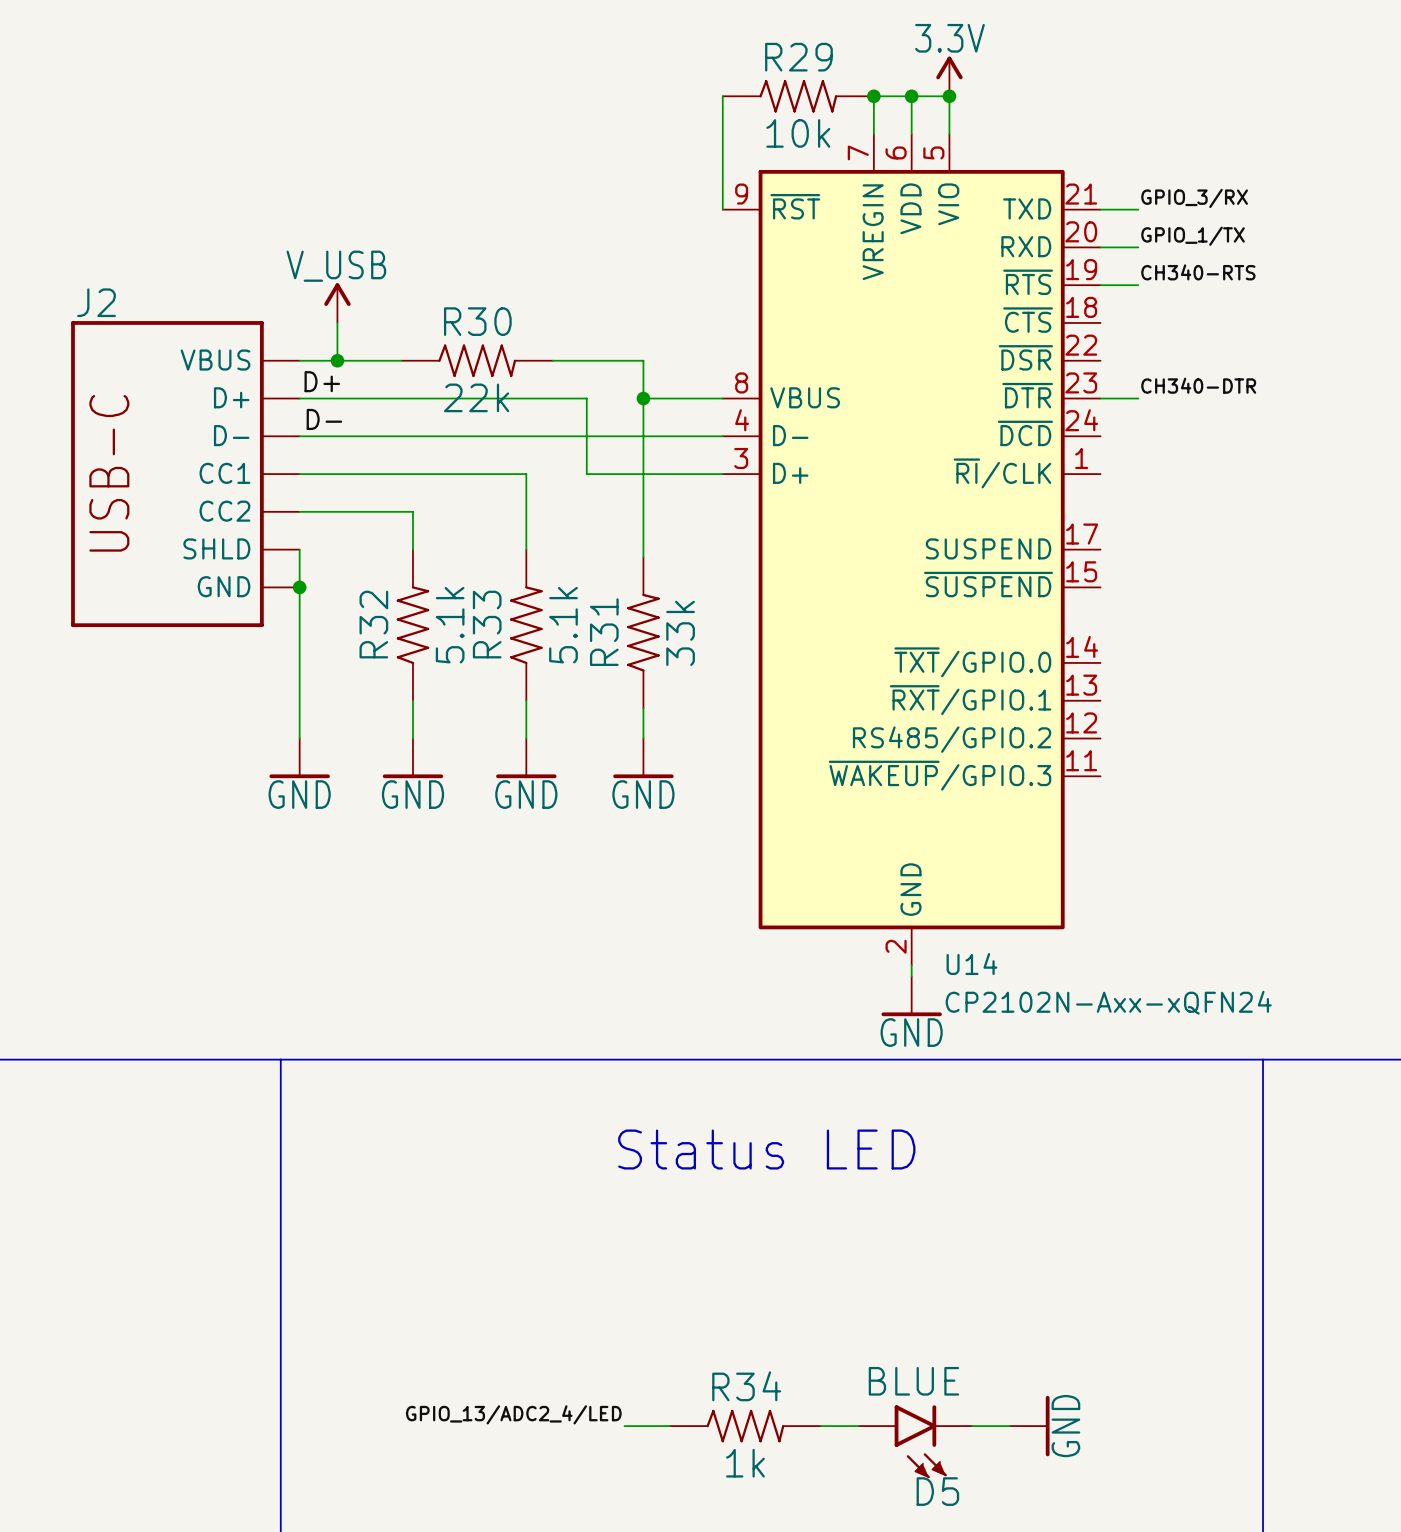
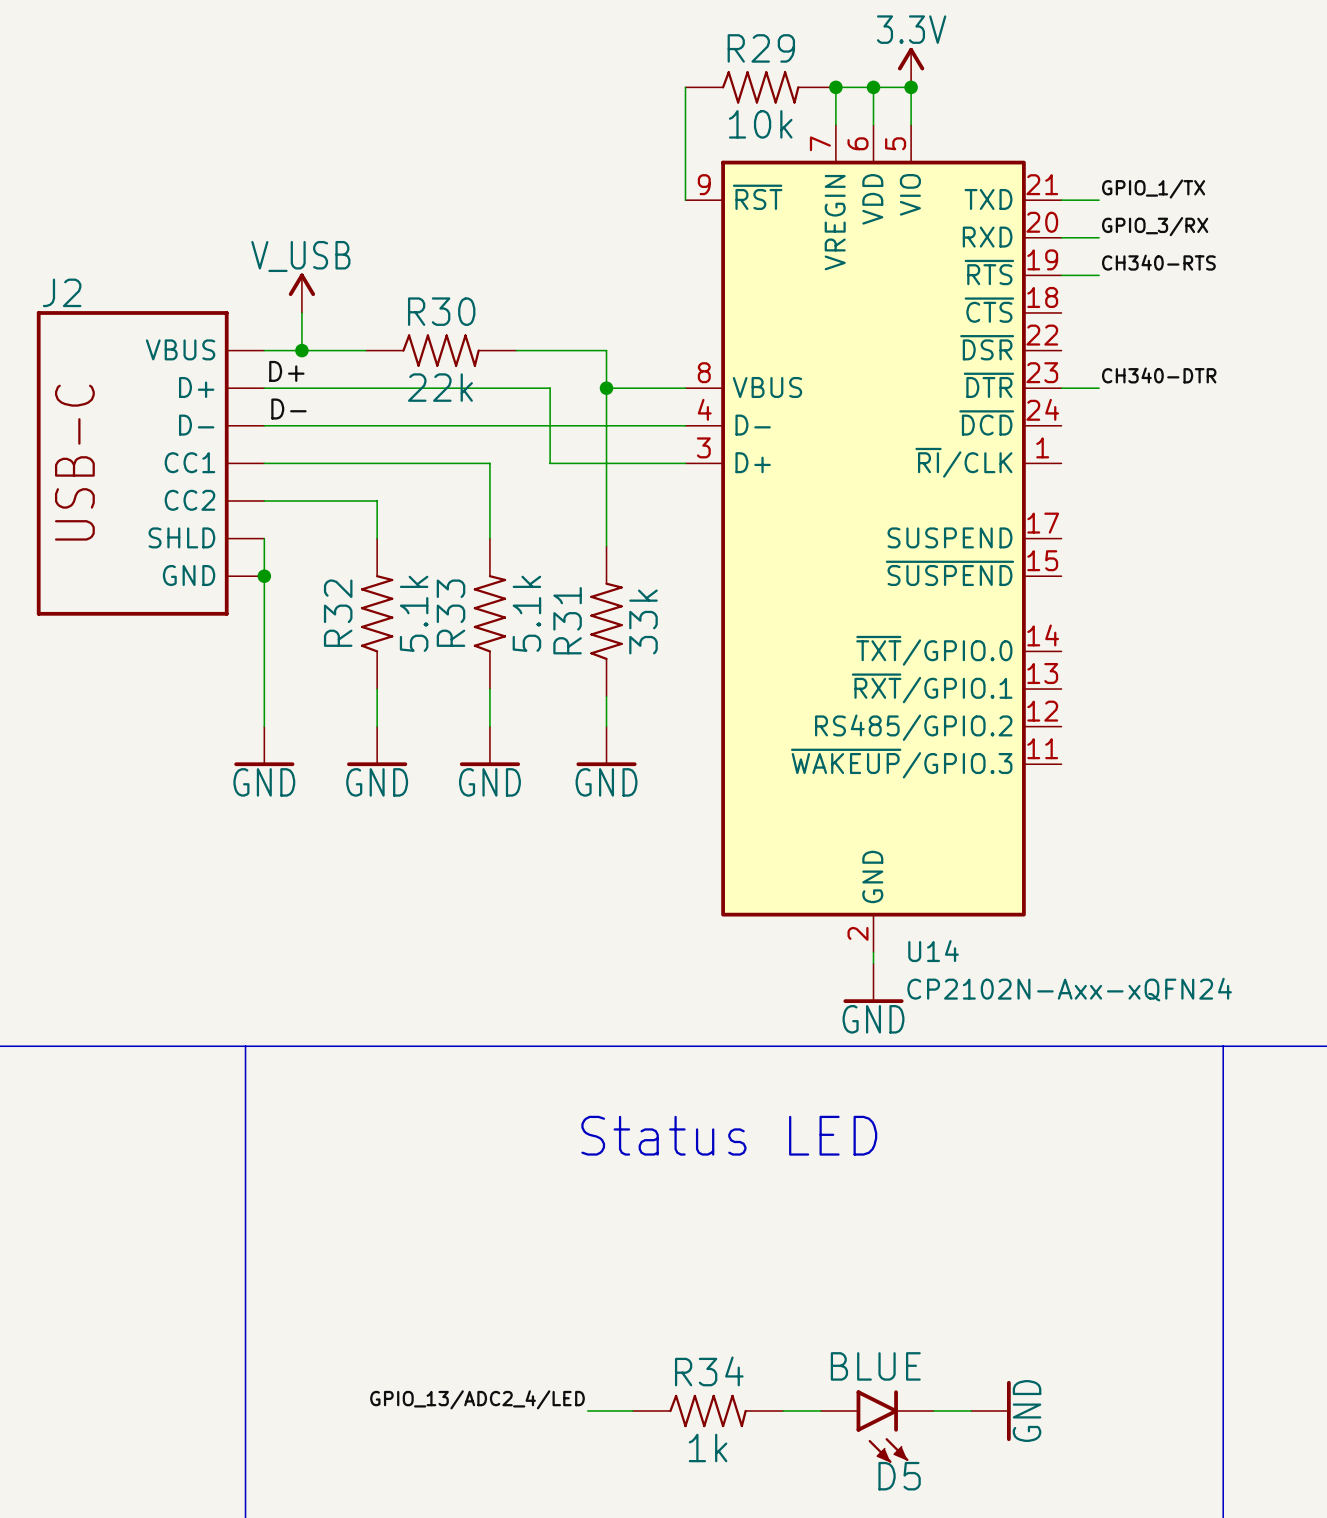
label: GPIO_3/RX (1194, 198) -> GPIO_1/TX (1153, 189)
label: GPIO_1/TX (1193, 236) -> GPIO_3/RX (1155, 226)

